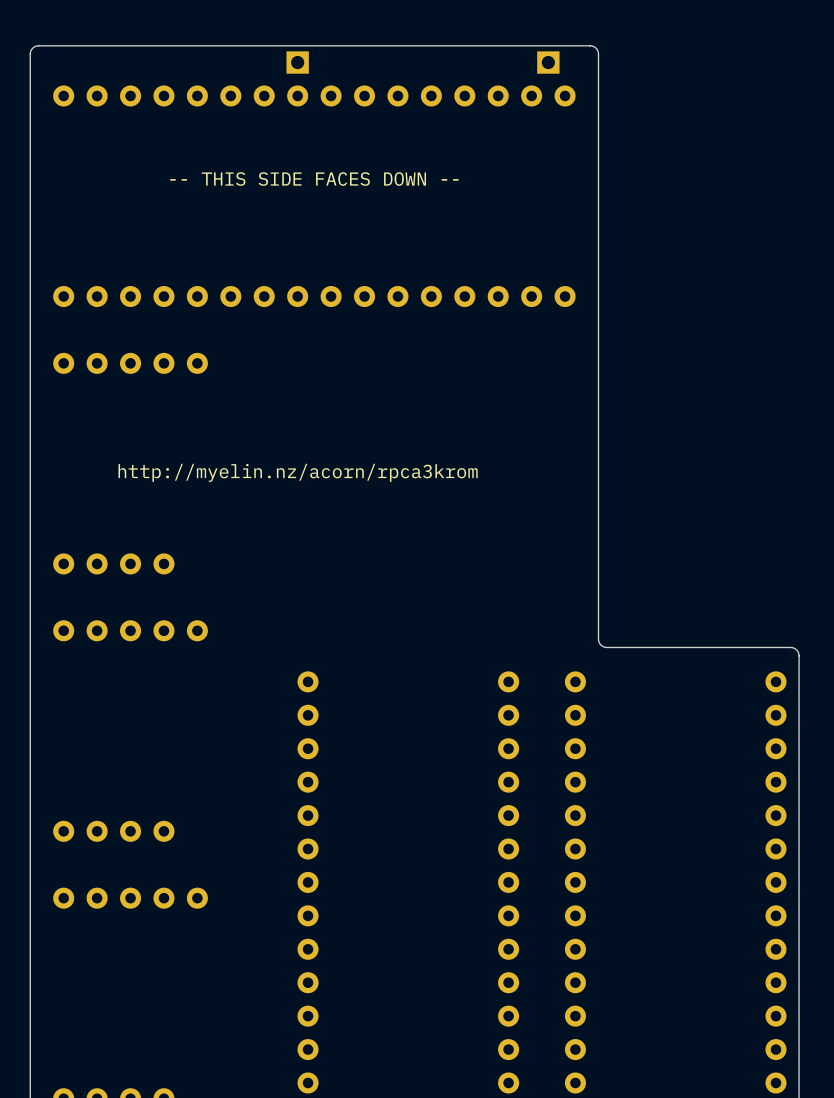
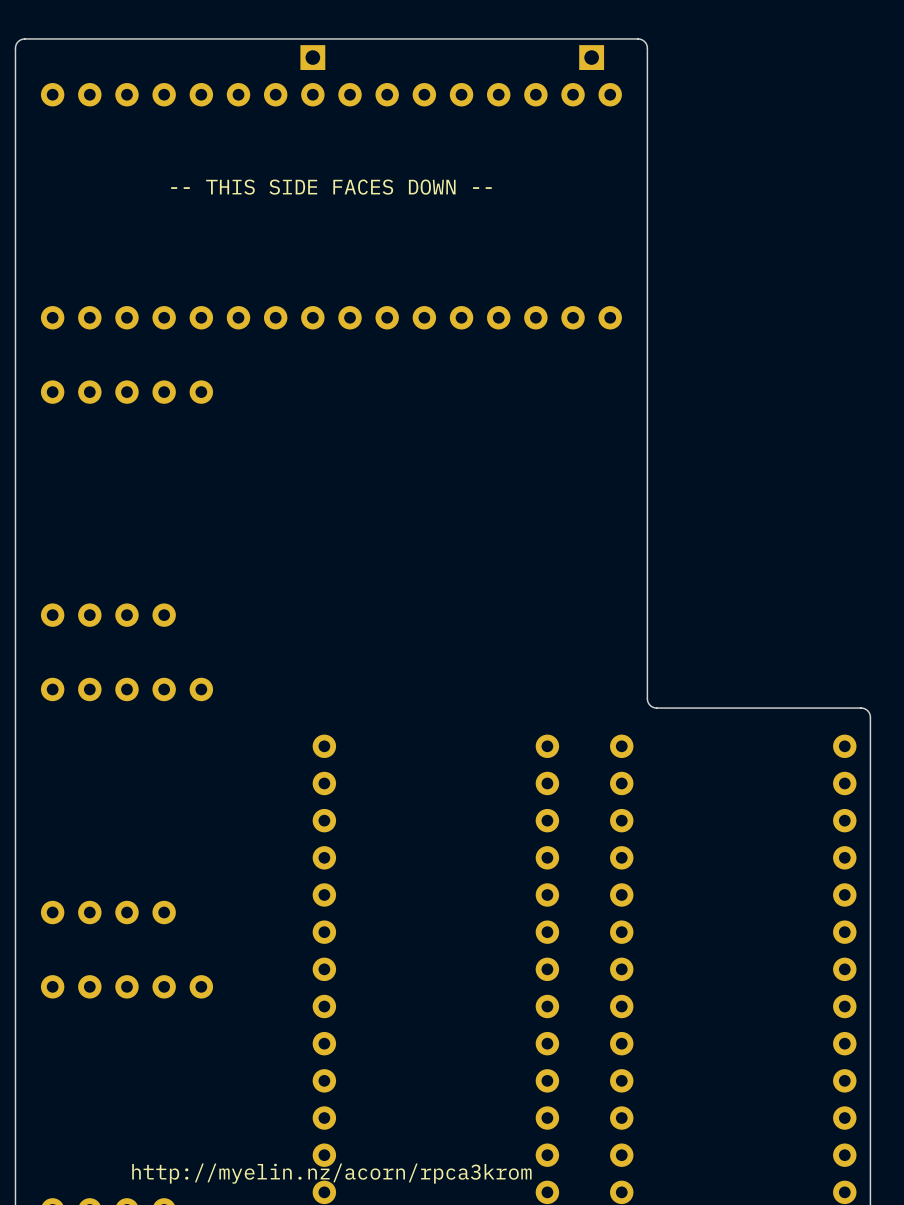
text: http://myelin.nz/acorn/rpca3krom (298, 472) -> none
text: none -> http://myelin.nz/acorn/rpca3krom (331, 1173)

